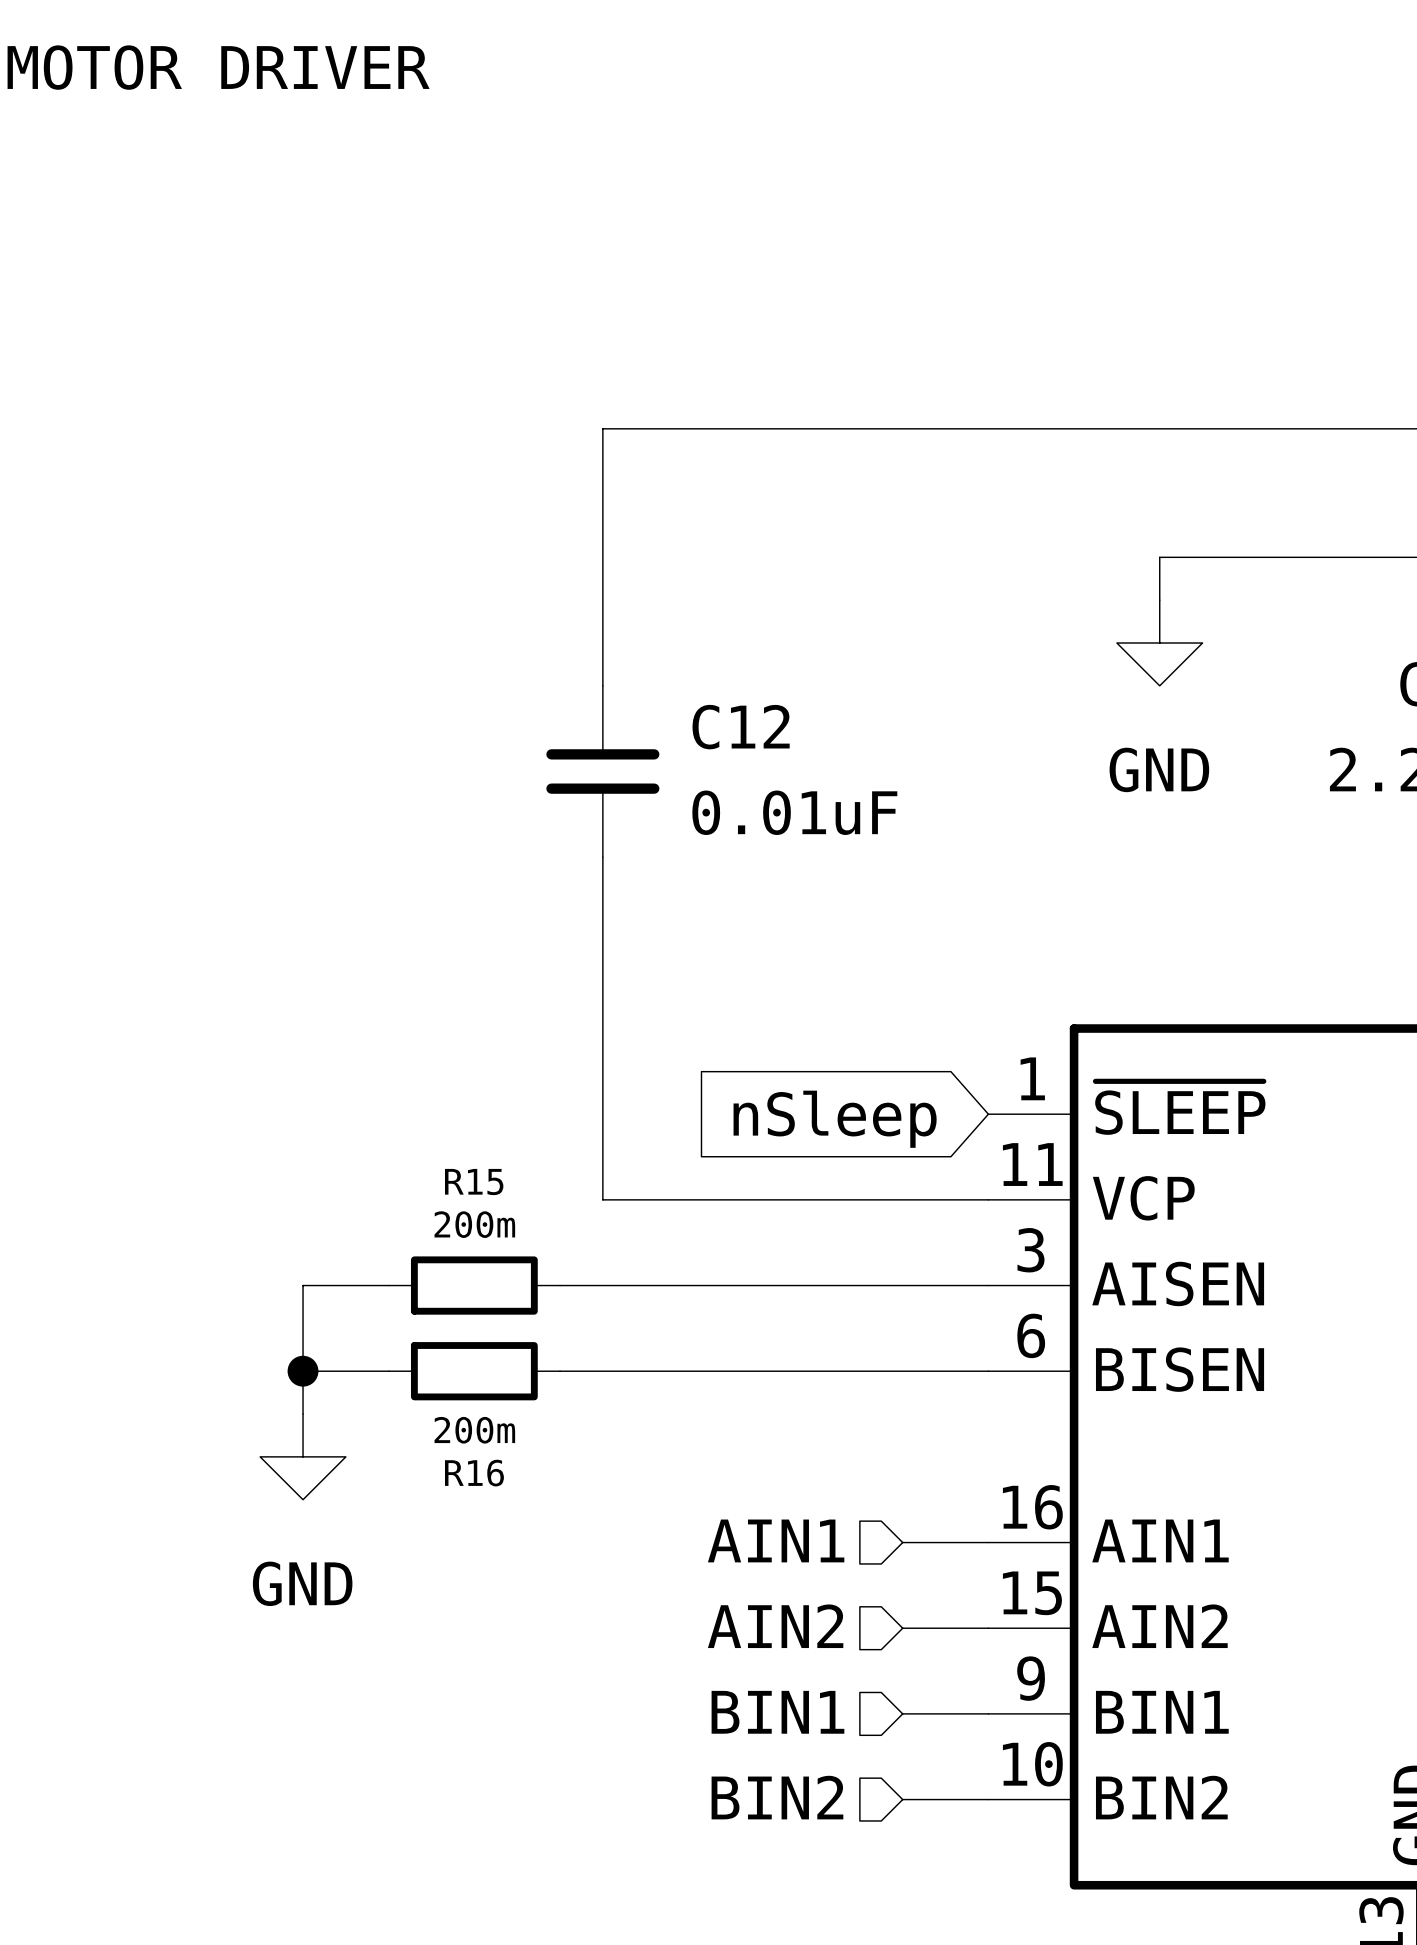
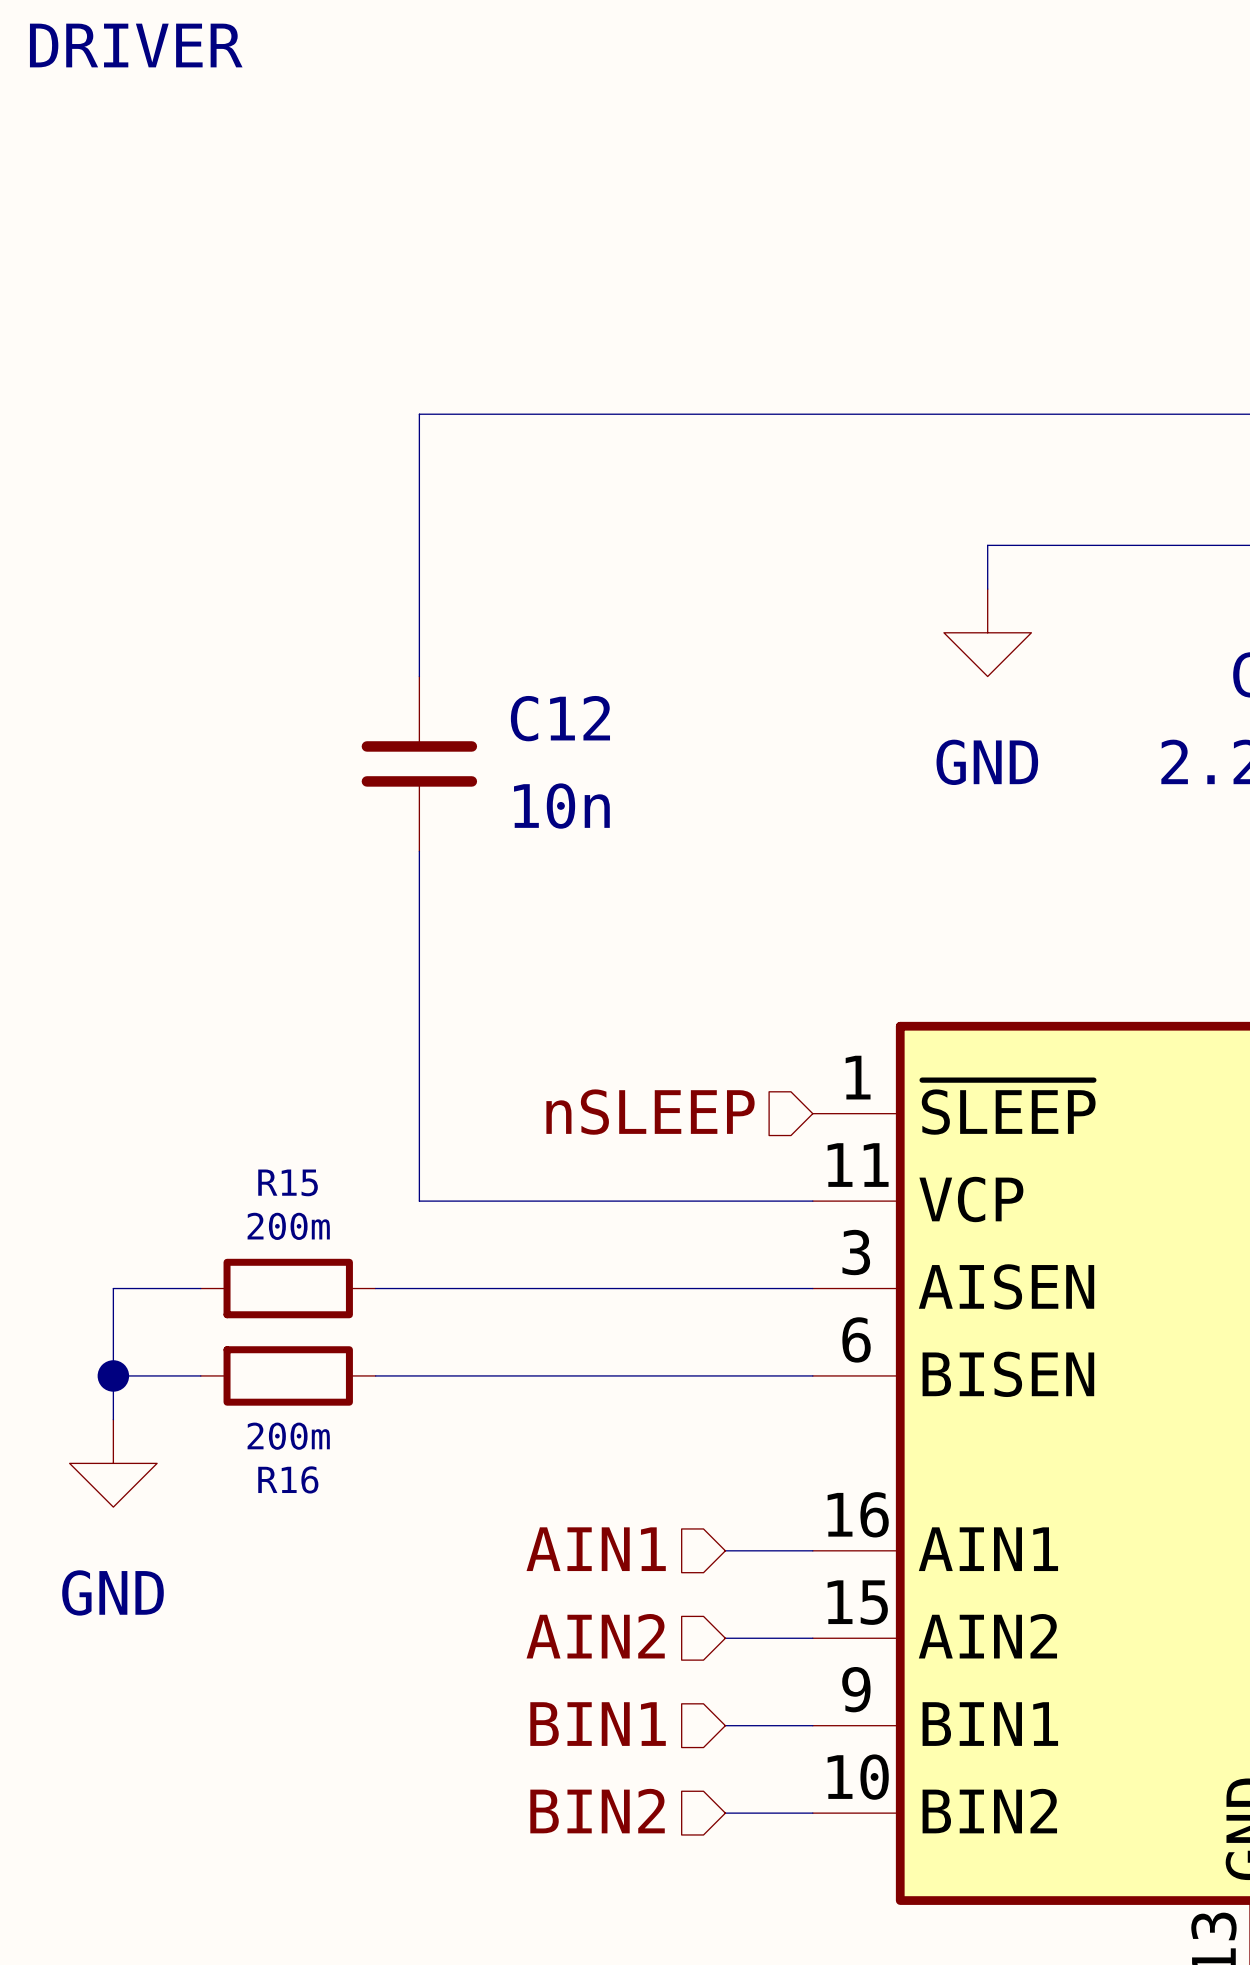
C12 value: 0.01uF (794, 812) -> 10n (561, 806)
hierarchical label: none -> nSLEEP (650, 1112)
global label: nSleep (835, 1119) -> none

